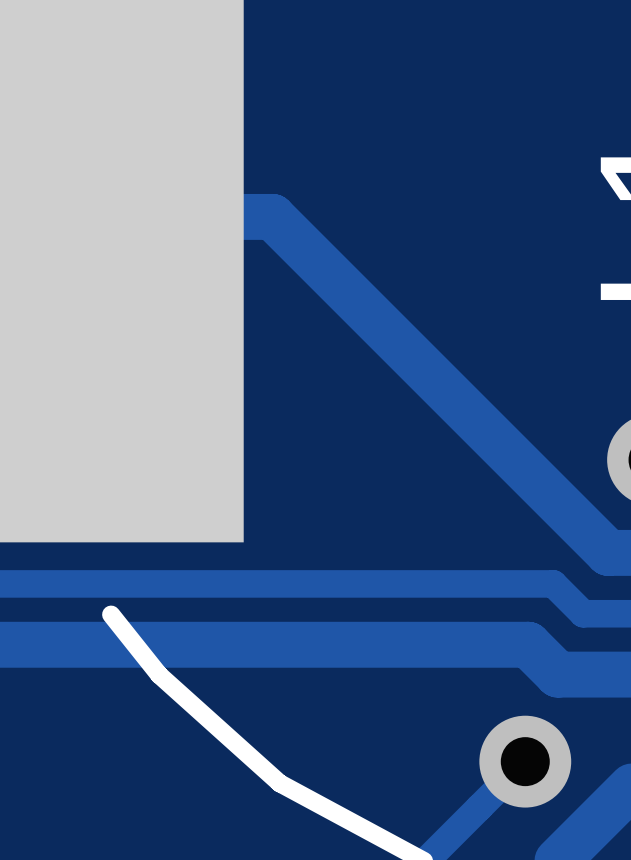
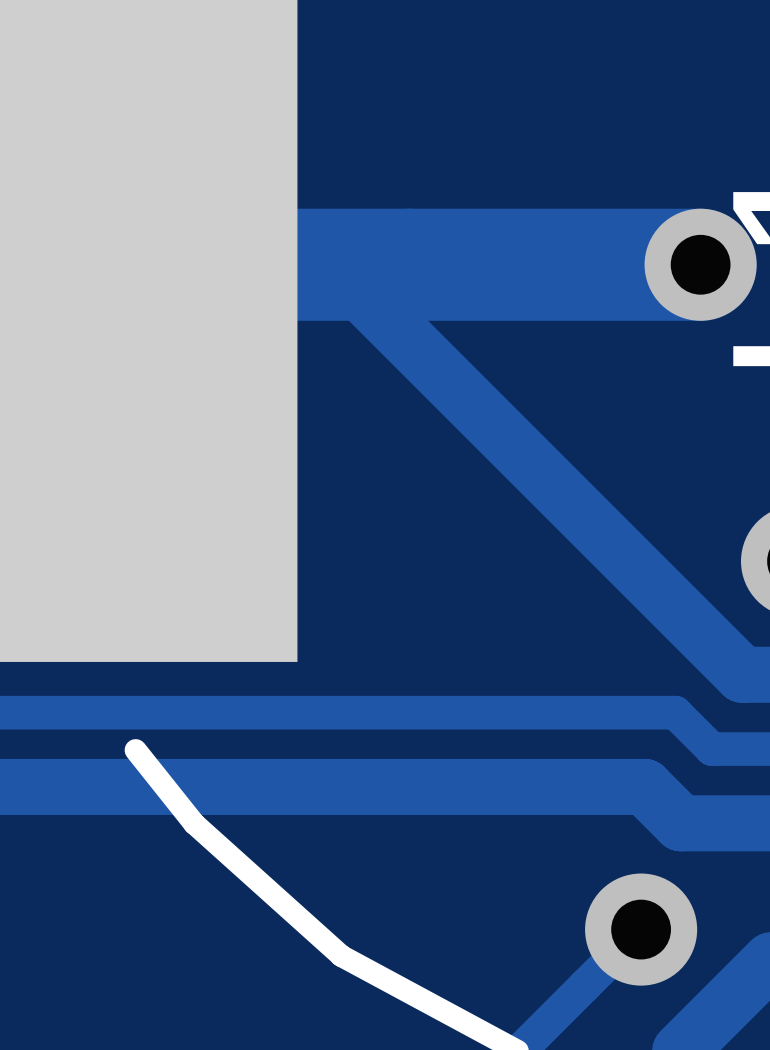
track: none -> (84, 264) (700, 264)
via: none -> (700, 264)

